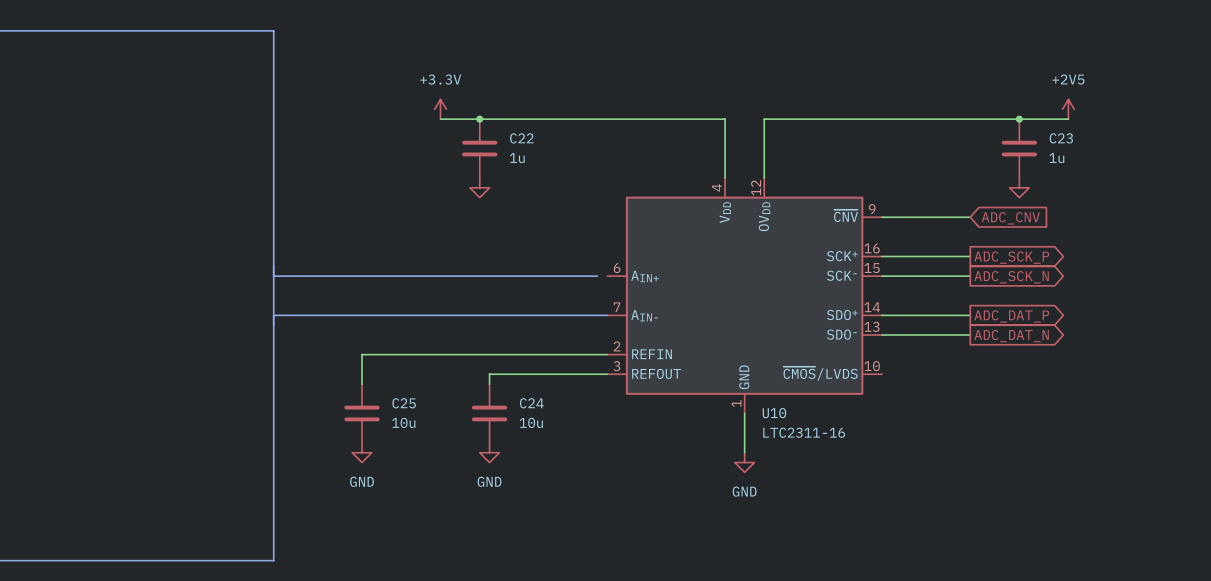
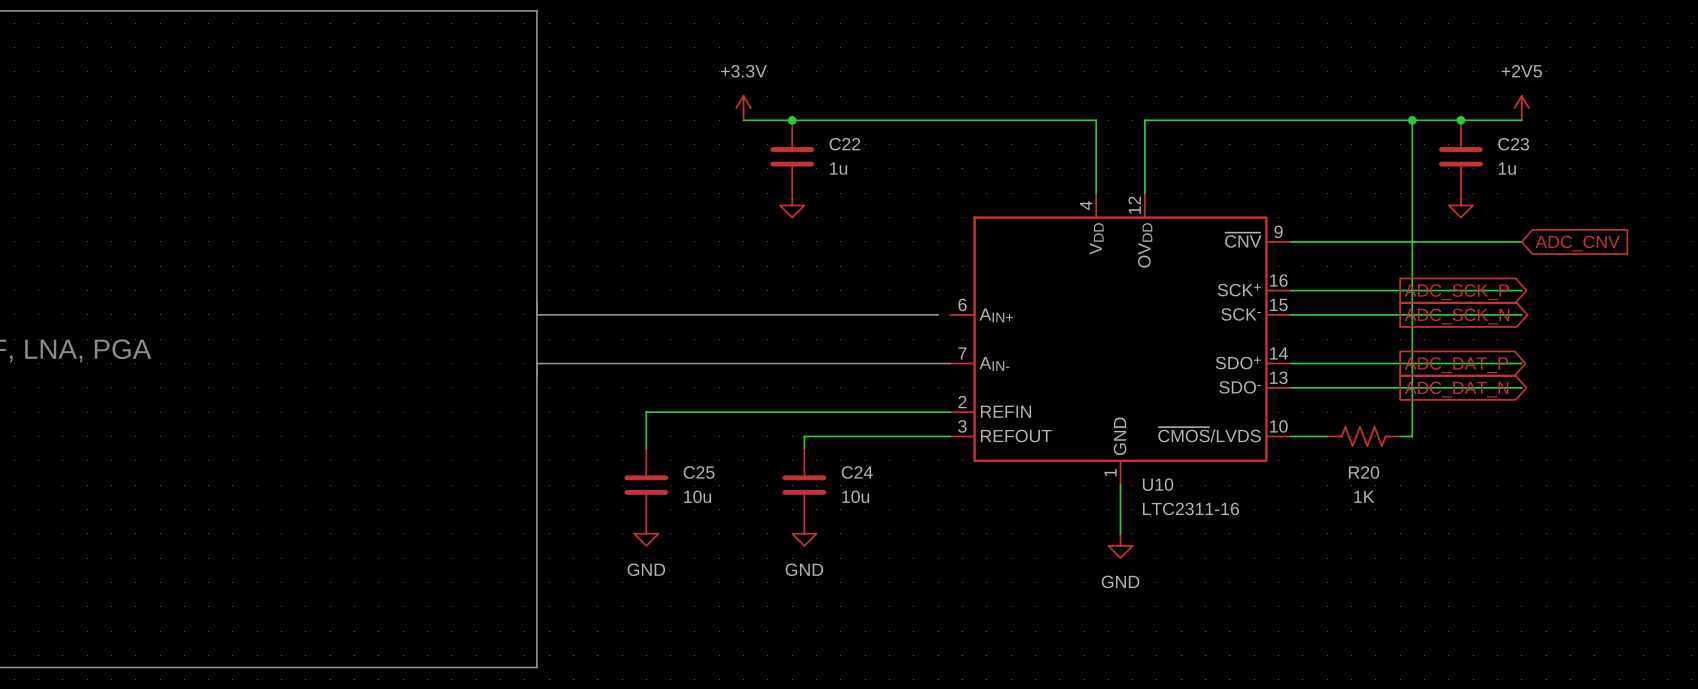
wire: none -> (1412, 120) (1412, 436) (1400, 436)
junction: none -> (1412, 120)
wire: none -> (1400, 241) (1521, 241)
global label position: ADC_CNV (1010, 218) -> ADC_CNV (1577, 243)
wire: none -> (1400, 290) (1521, 290)
wire: none -> (1400, 314) (1521, 314)
wire: none -> (1400, 363) (1521, 363)
wire: none -> (1400, 387) (1521, 387)
wire: none -> (1290, 436) (1327, 436)
R20: none -> 1K (1363, 436)

